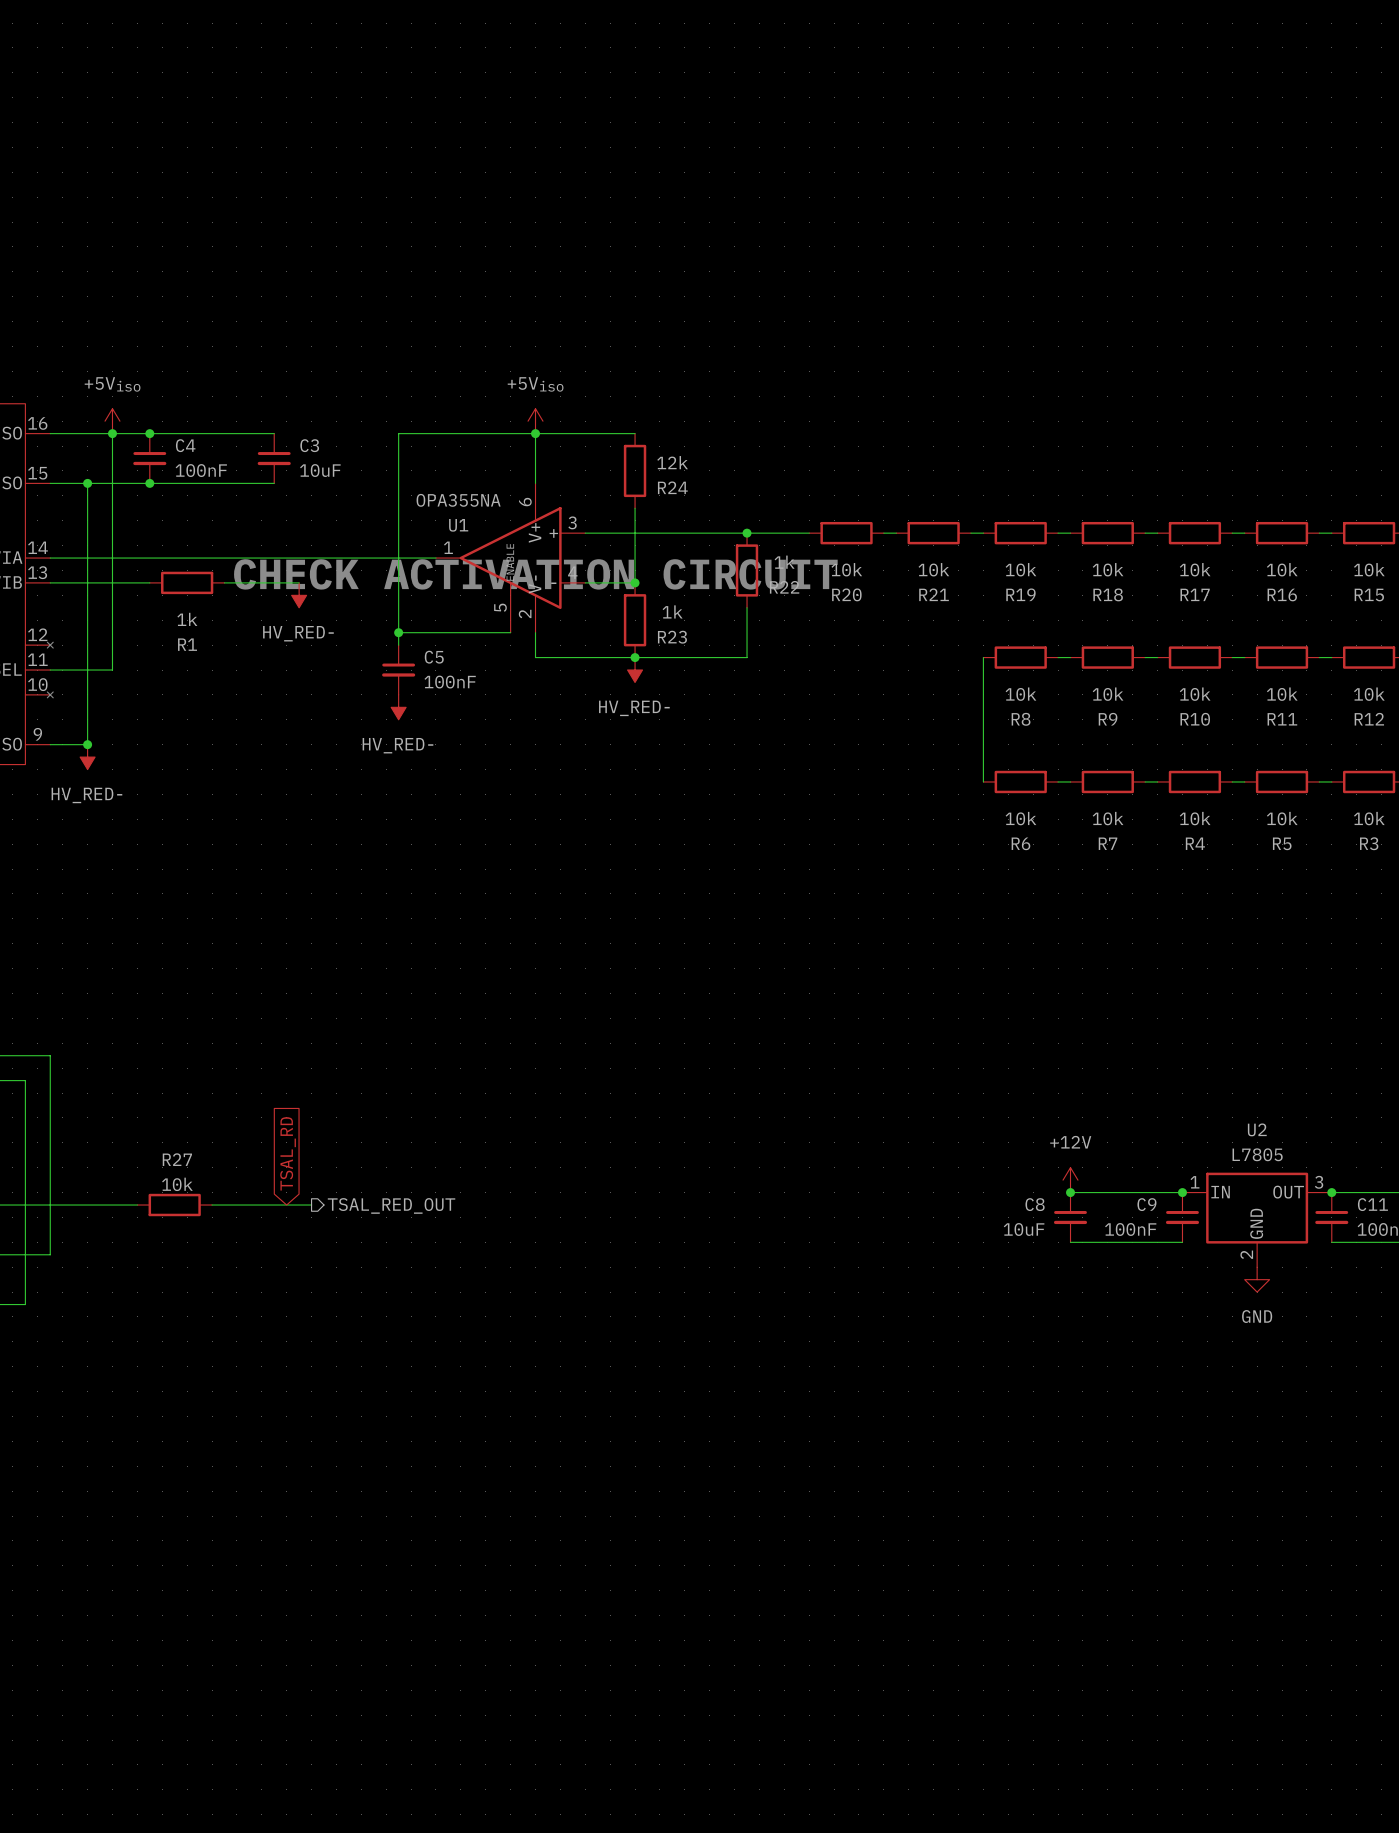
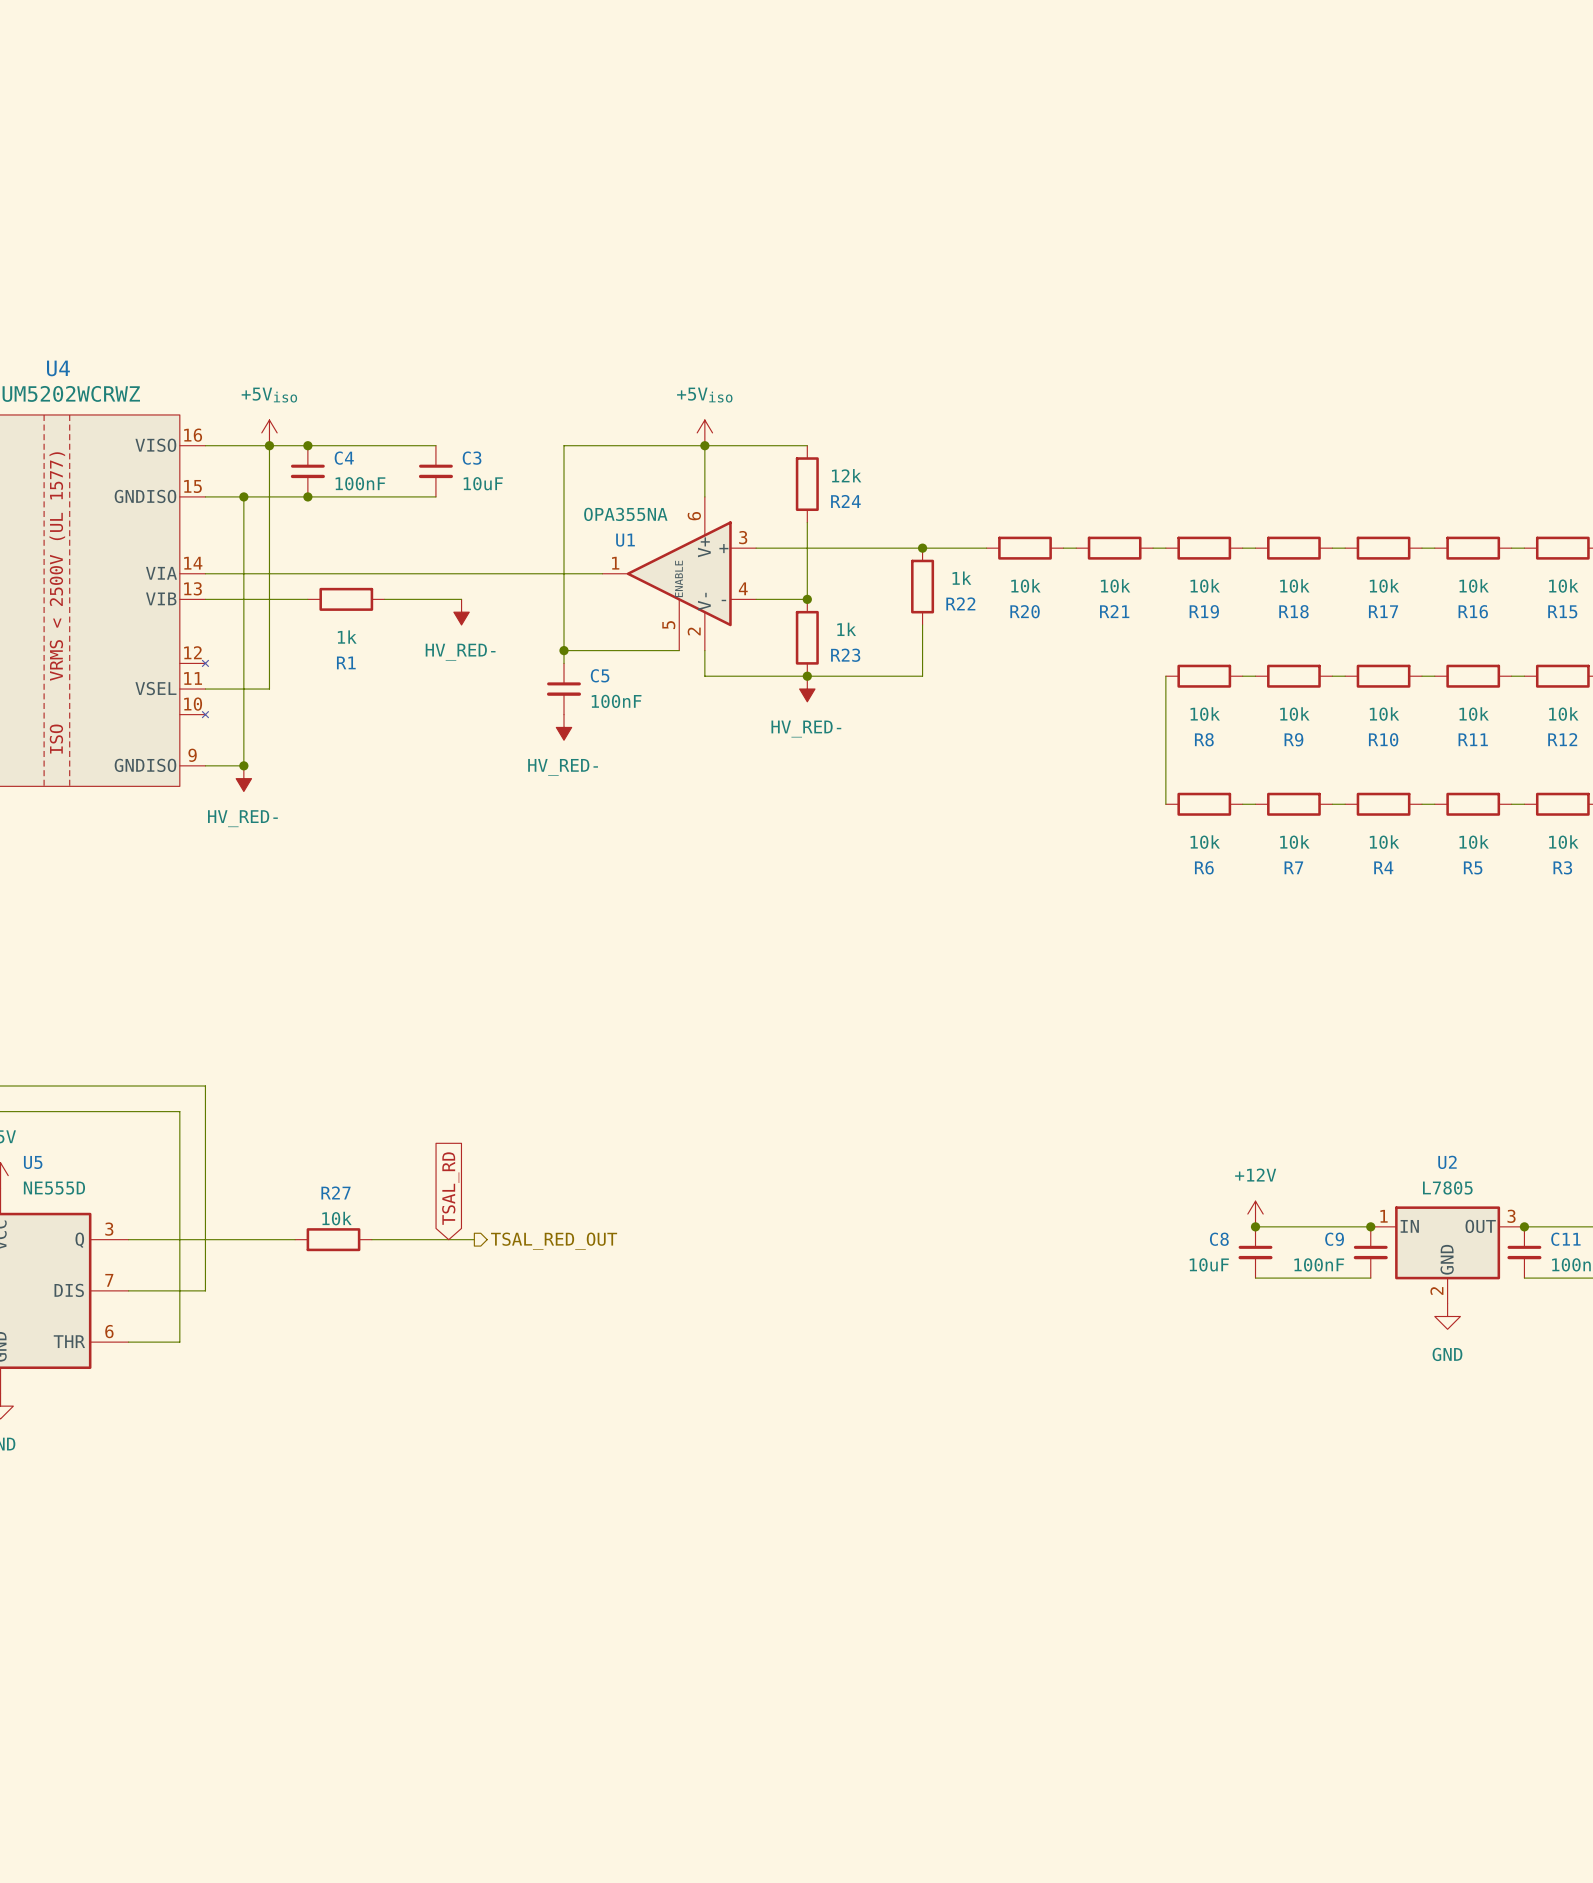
text: CHECK ACTIVATION CIRCUIT (535, 574) -> none

